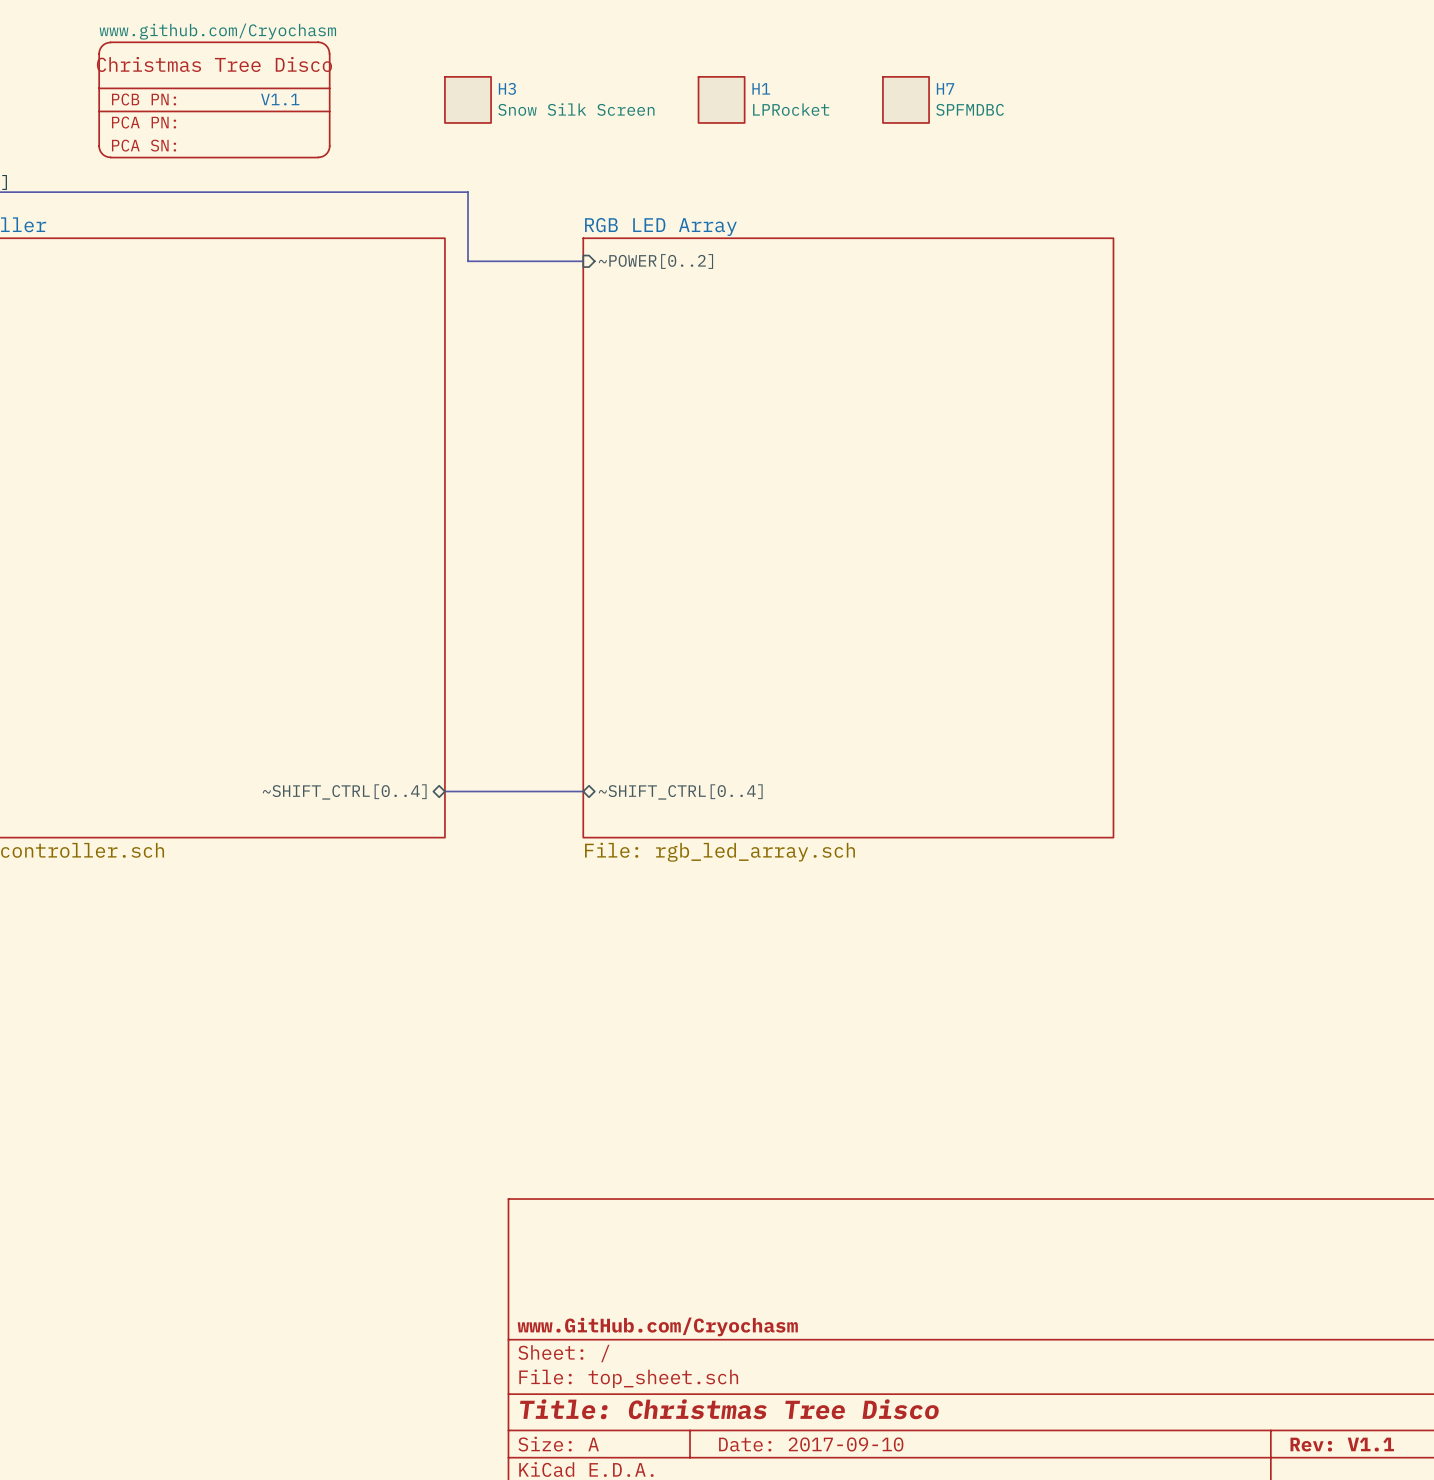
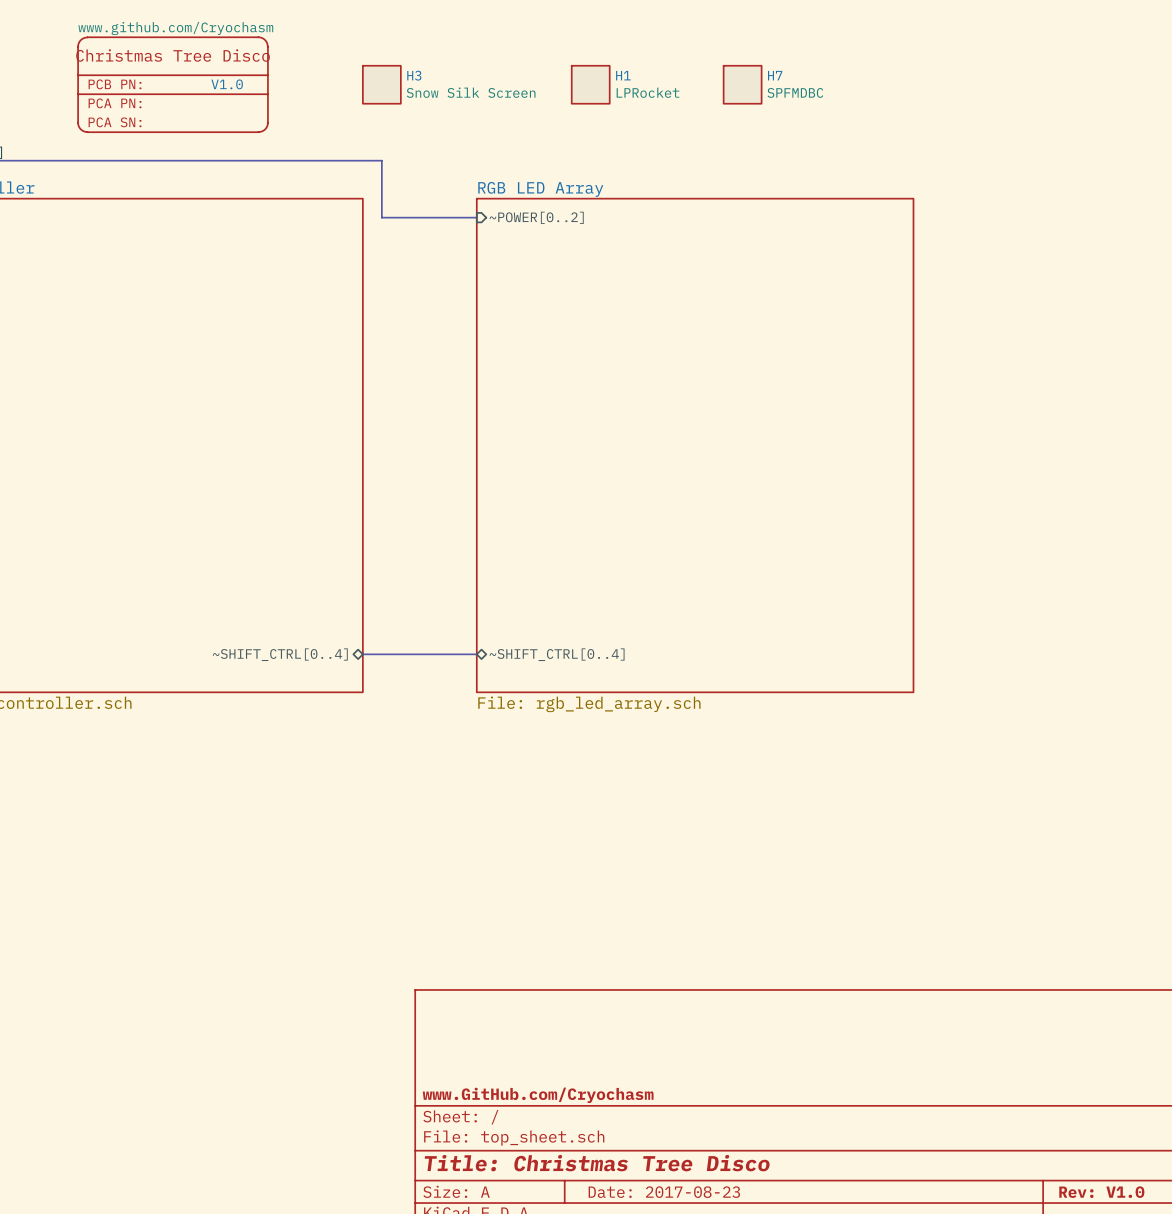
V1.1 name: V1.1 (280, 99) -> V1.0 (227, 84)
title block: Date: 2017-09-10 (811, 1444) -> Date: 2017-08-23 (664, 1192)
title block: Rev: V1.1 (1342, 1444) -> Rev: V1.0 (1101, 1192)

